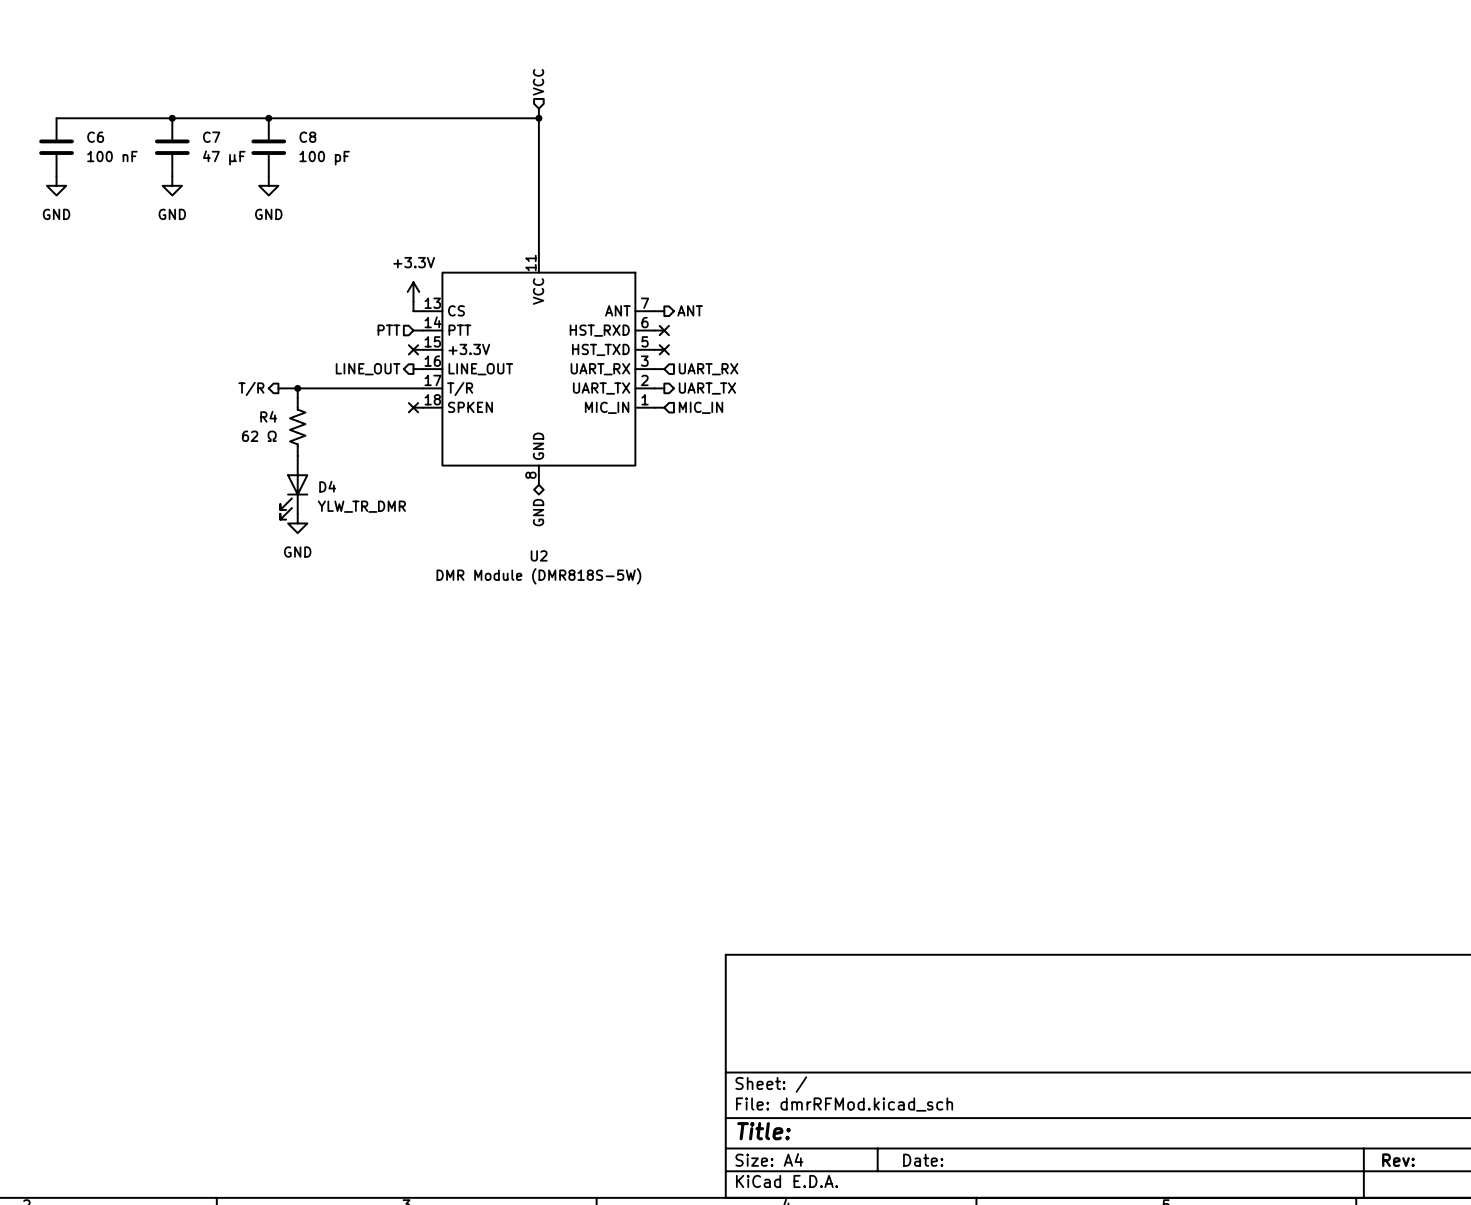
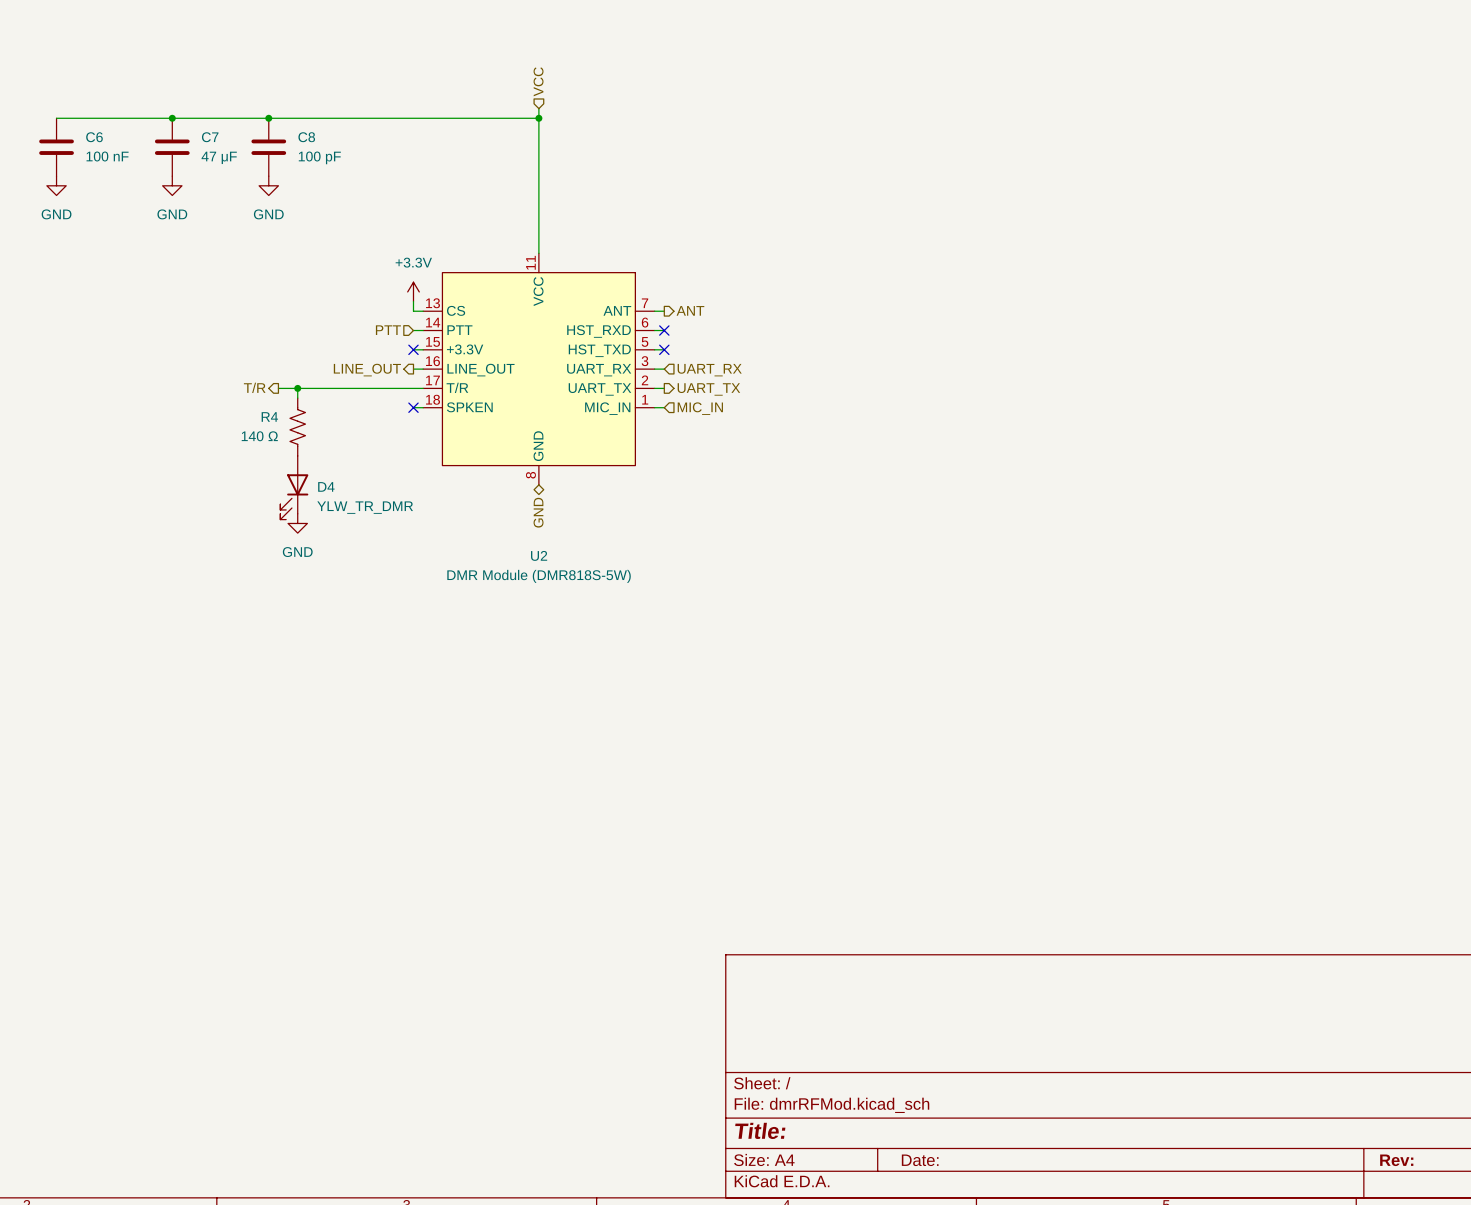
R4 value: 62 Ω (259, 436) -> 140 Ω (259, 436)

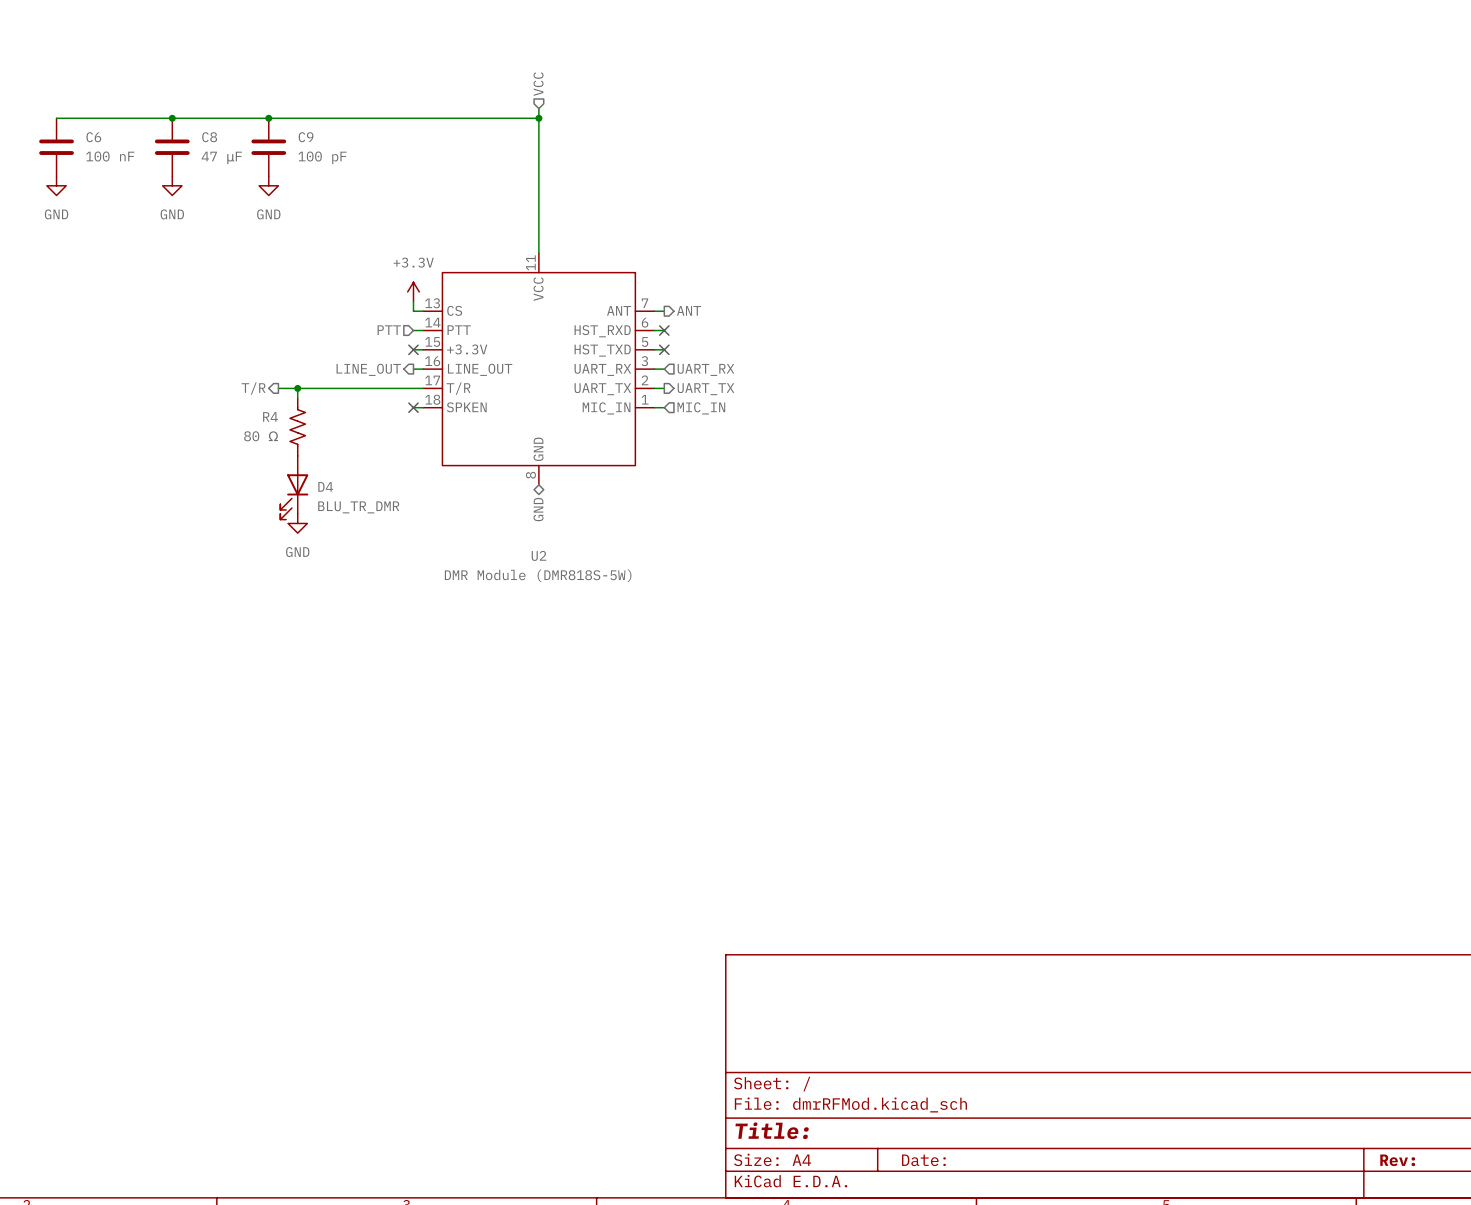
C7 name: C7 (210, 137) -> C8 (209, 137)
C8 name: C8 (306, 137) -> C9 (306, 137)
R4 value: 140 Ω (259, 436) -> 80 Ω (261, 436)
D4 value: YLW_TR_DMR (365, 507) -> BLU_TR_DMR (358, 507)

